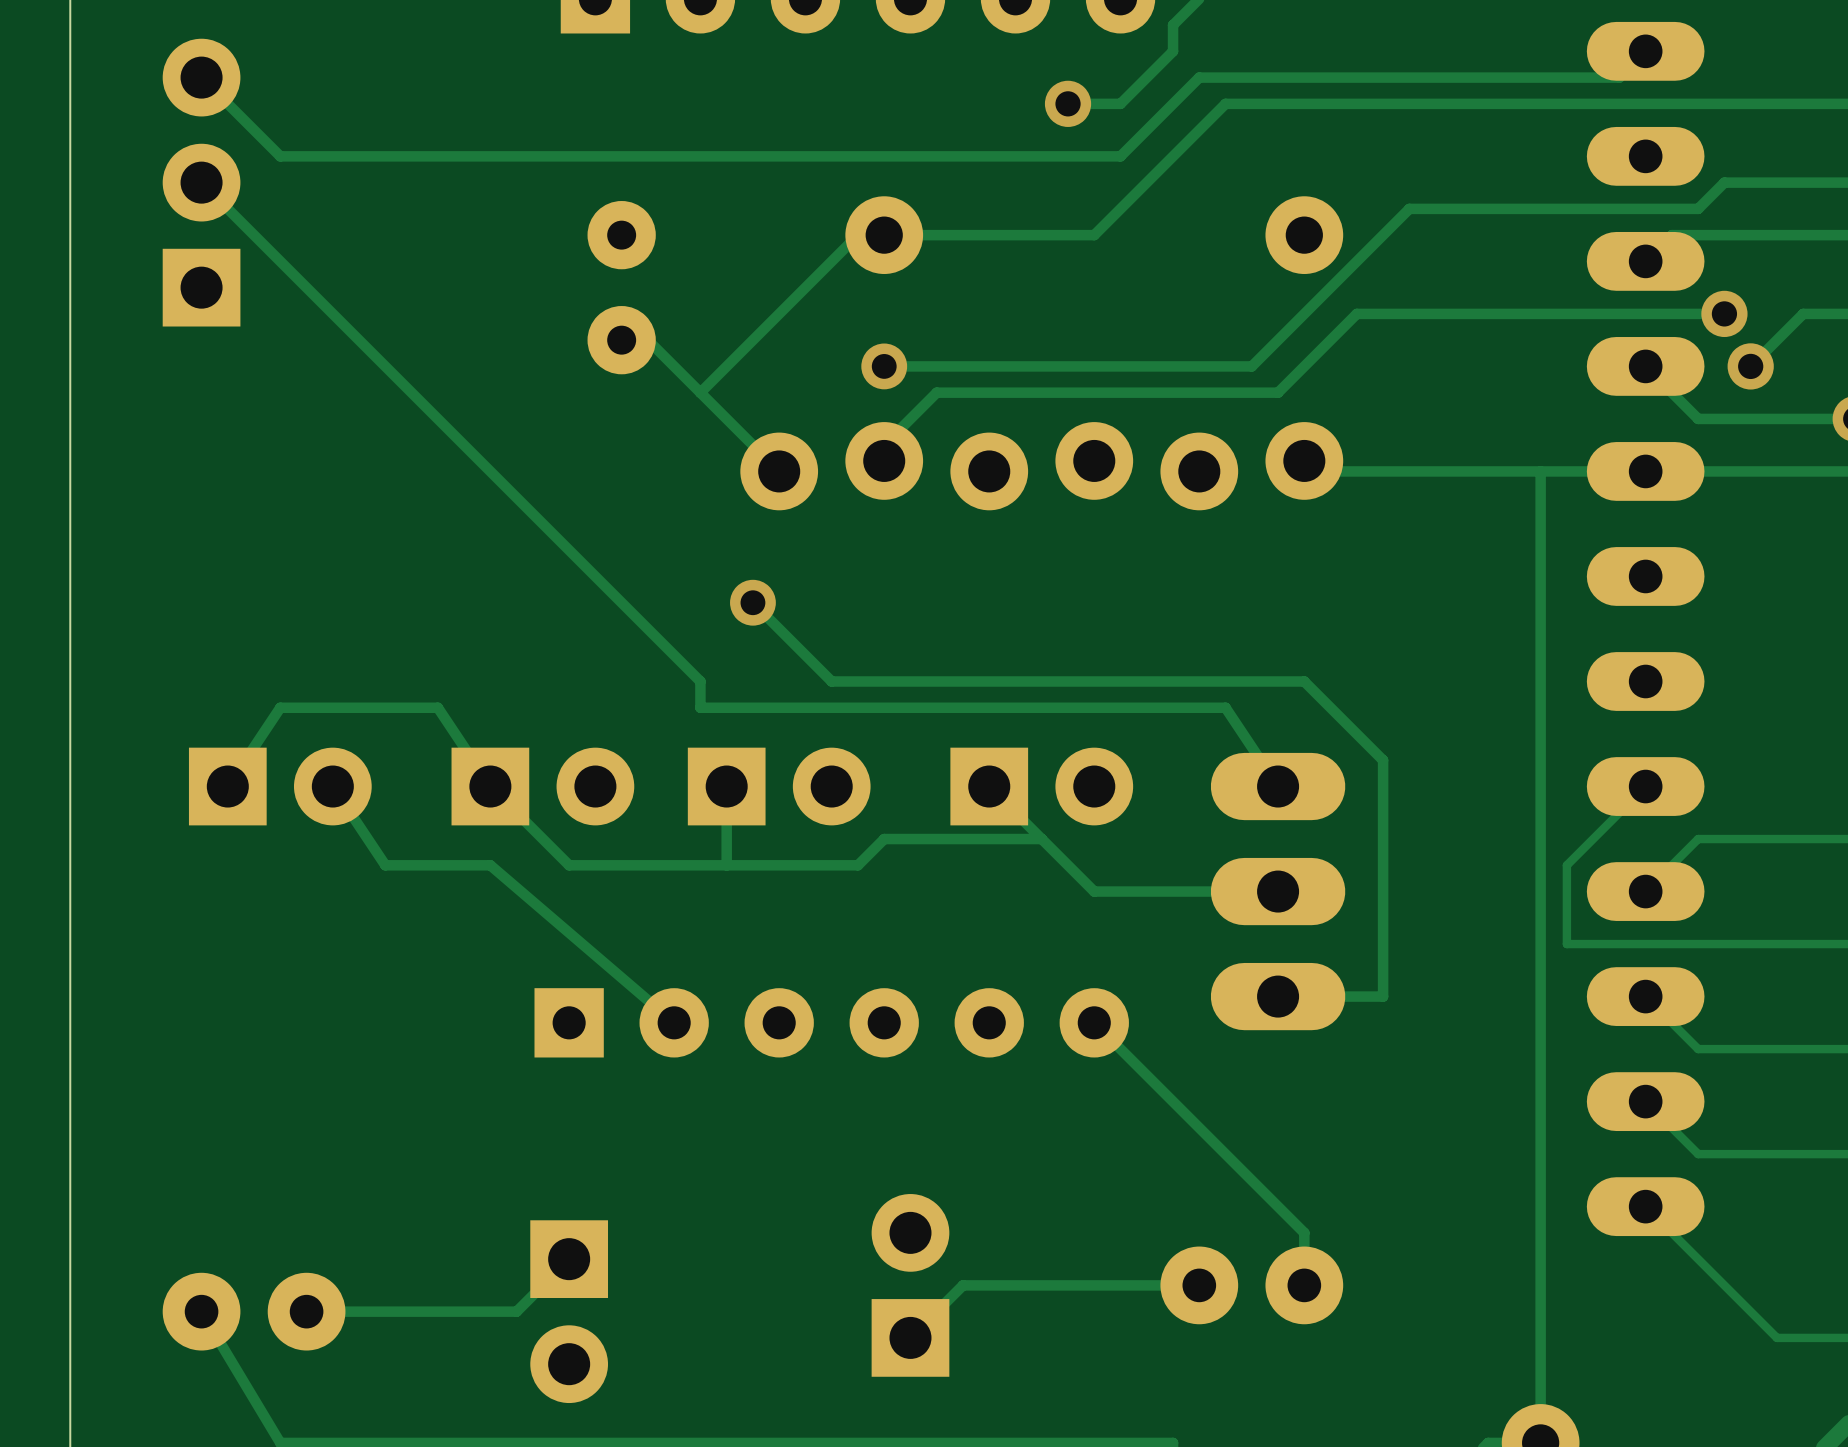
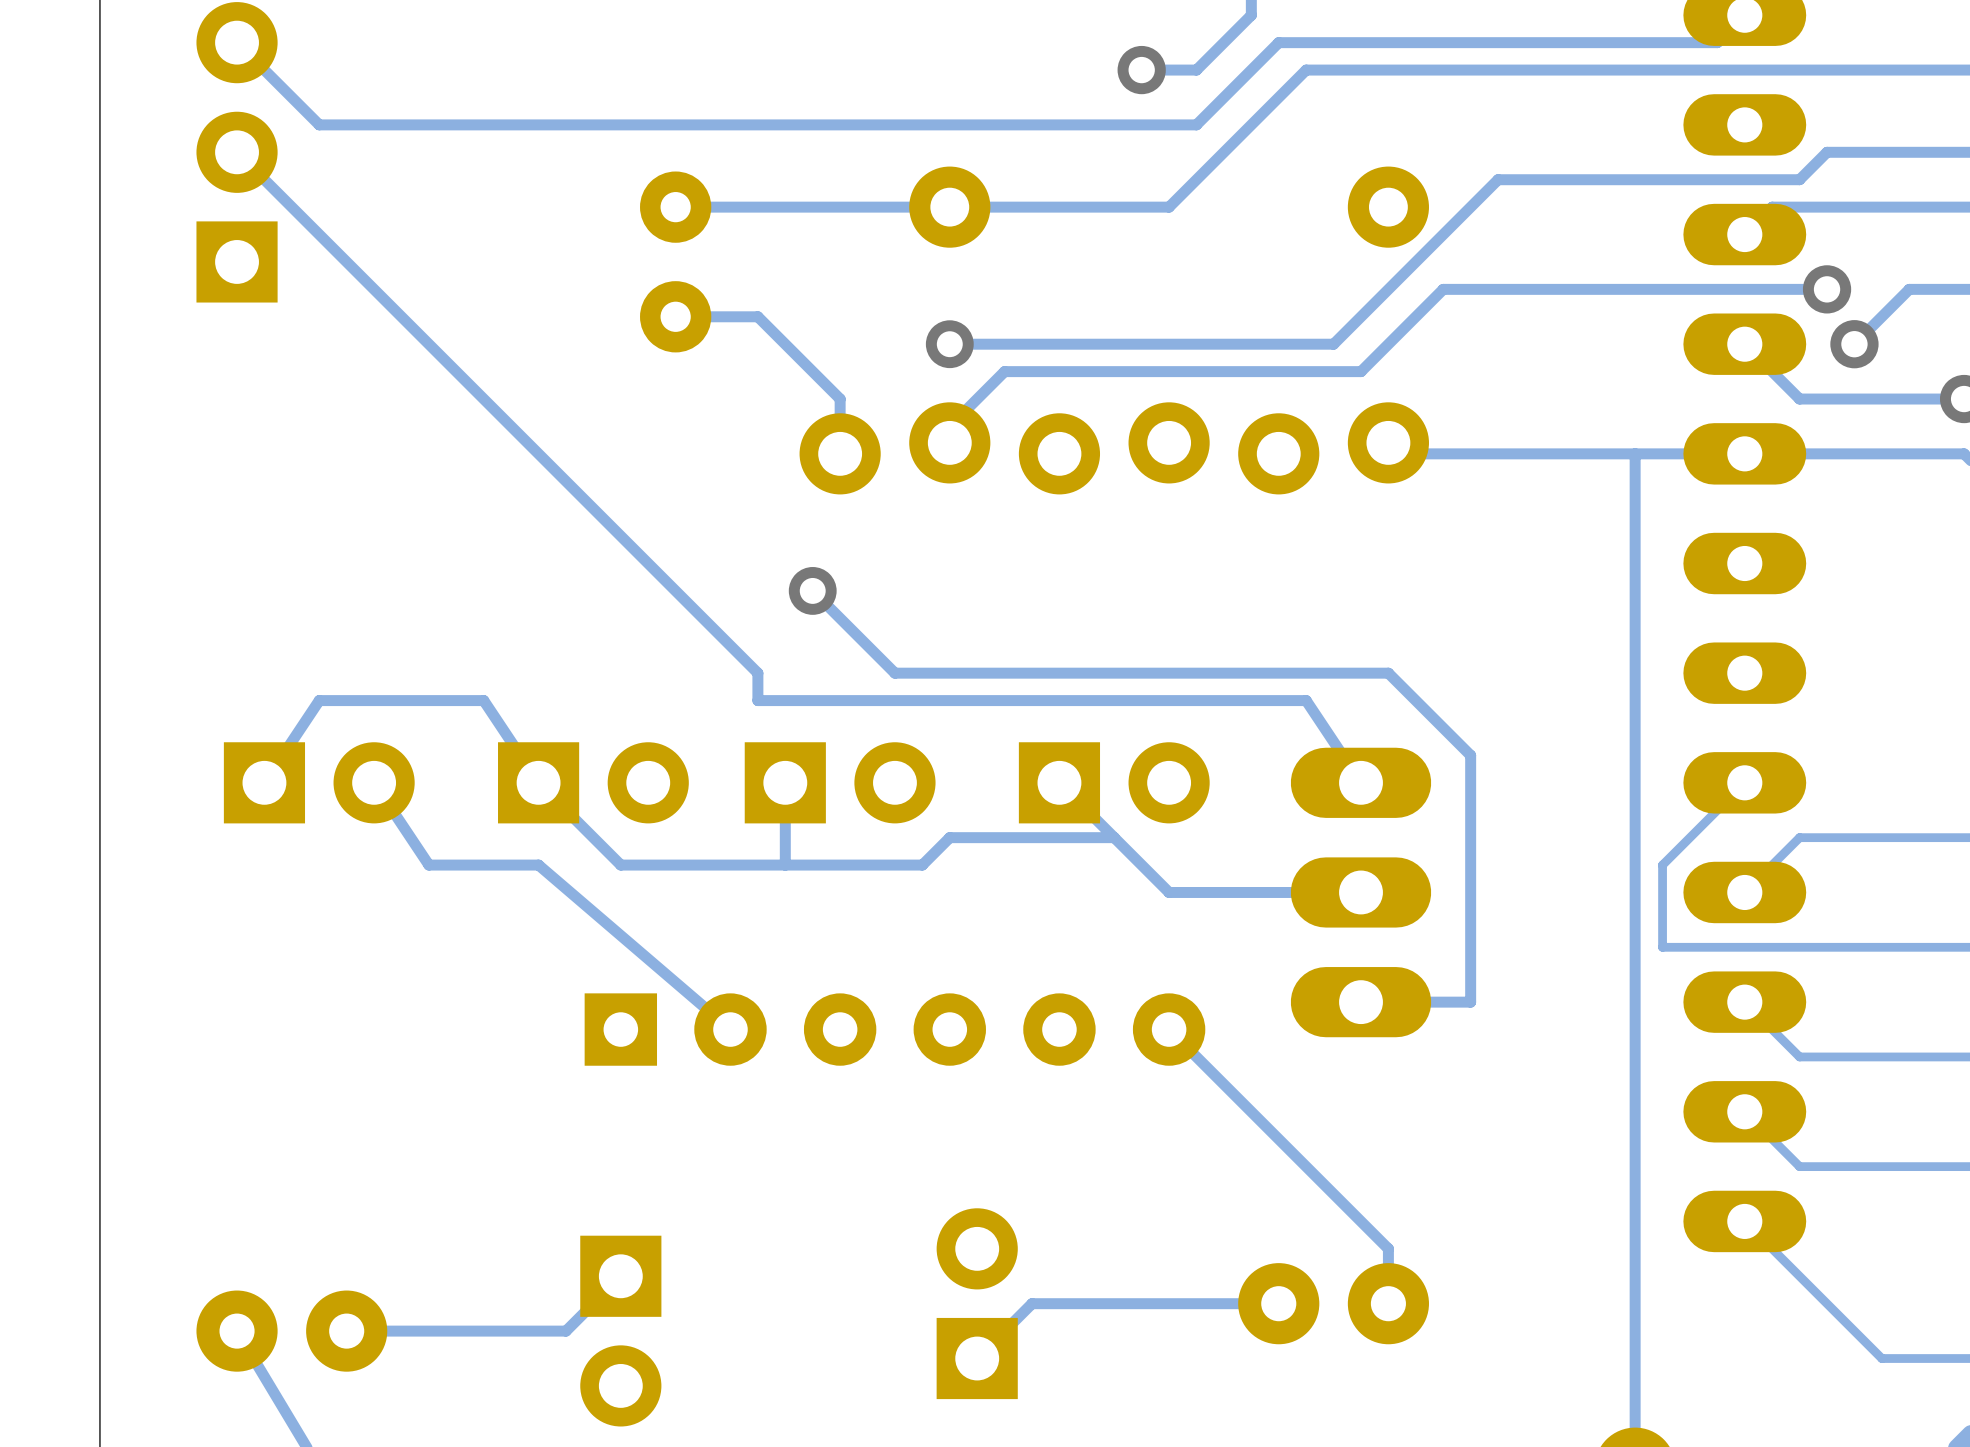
track: (857, 235) (700, 392) -> (922, 207) (675, 207)
track: (647, 340) (779, 471) -> (703, 316) (757, 316) (840, 399) (840, 453)

